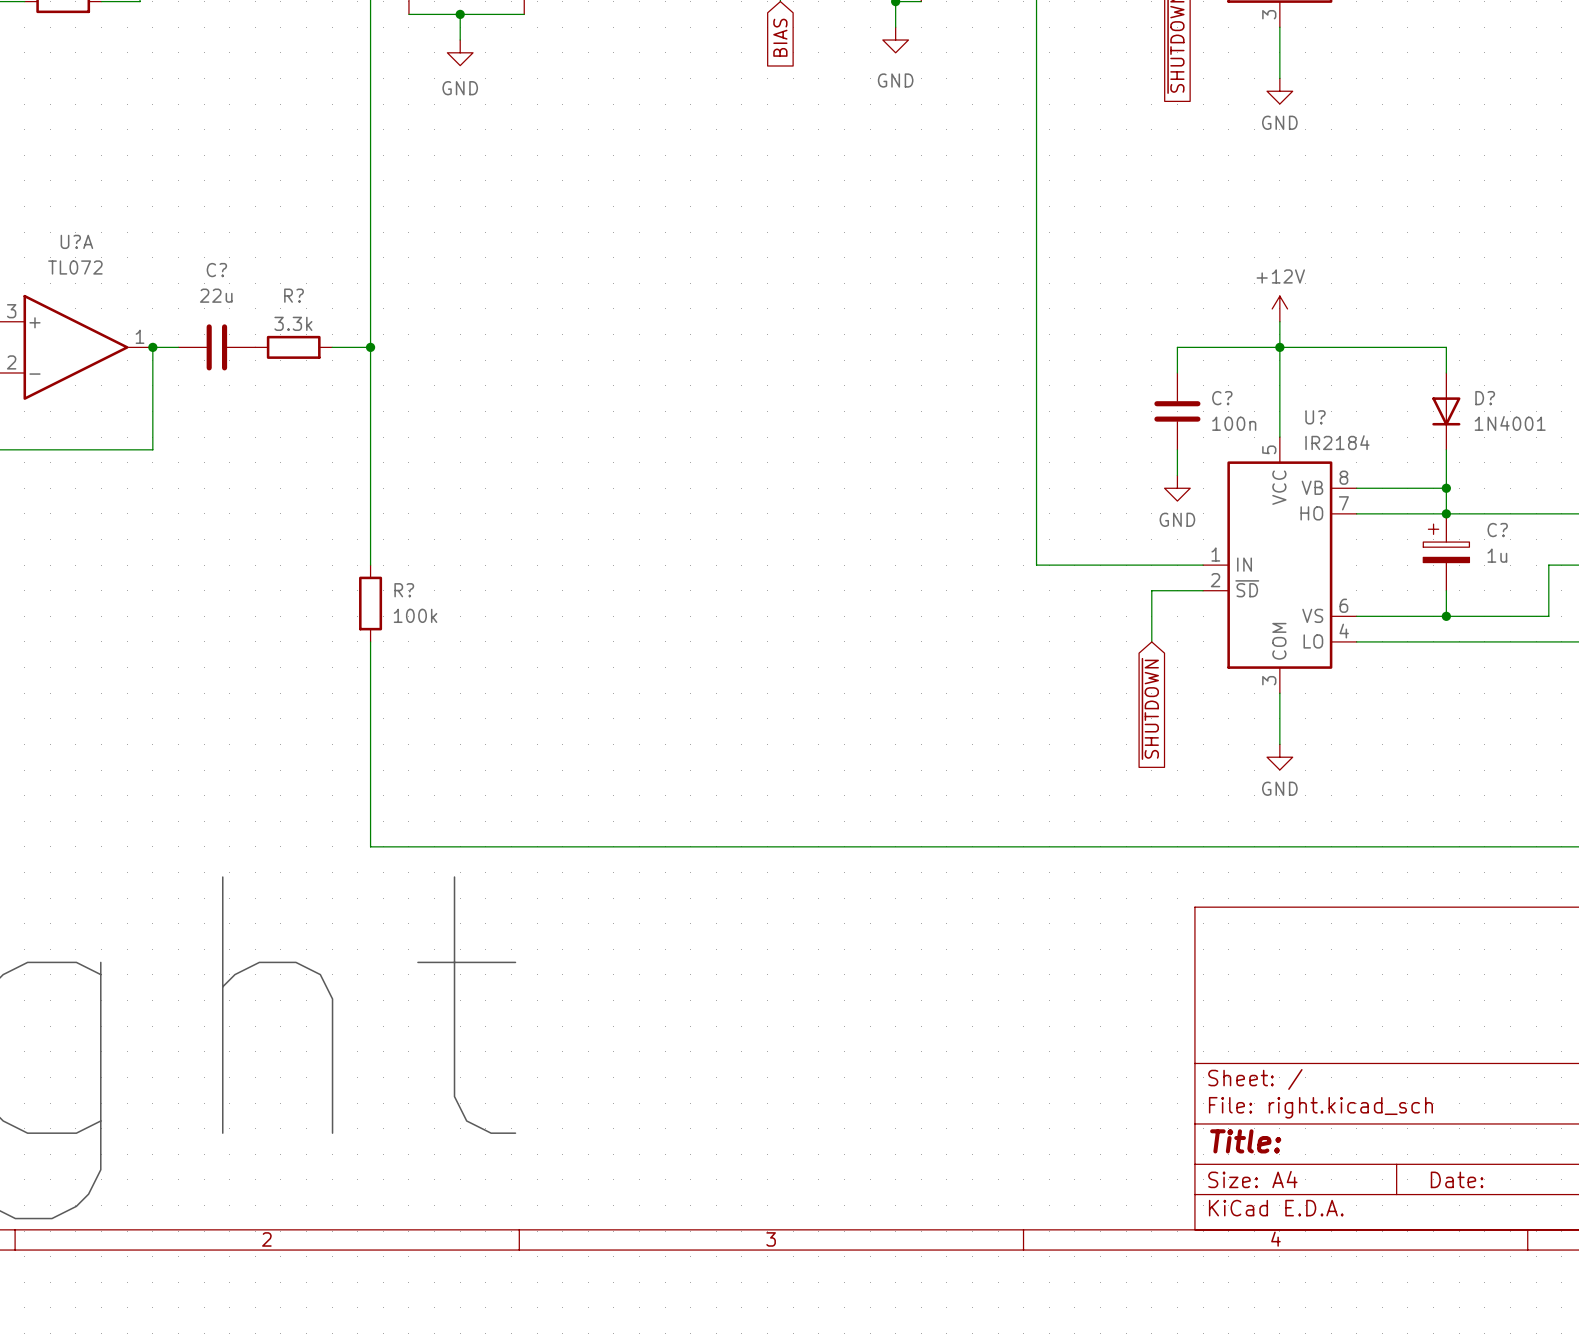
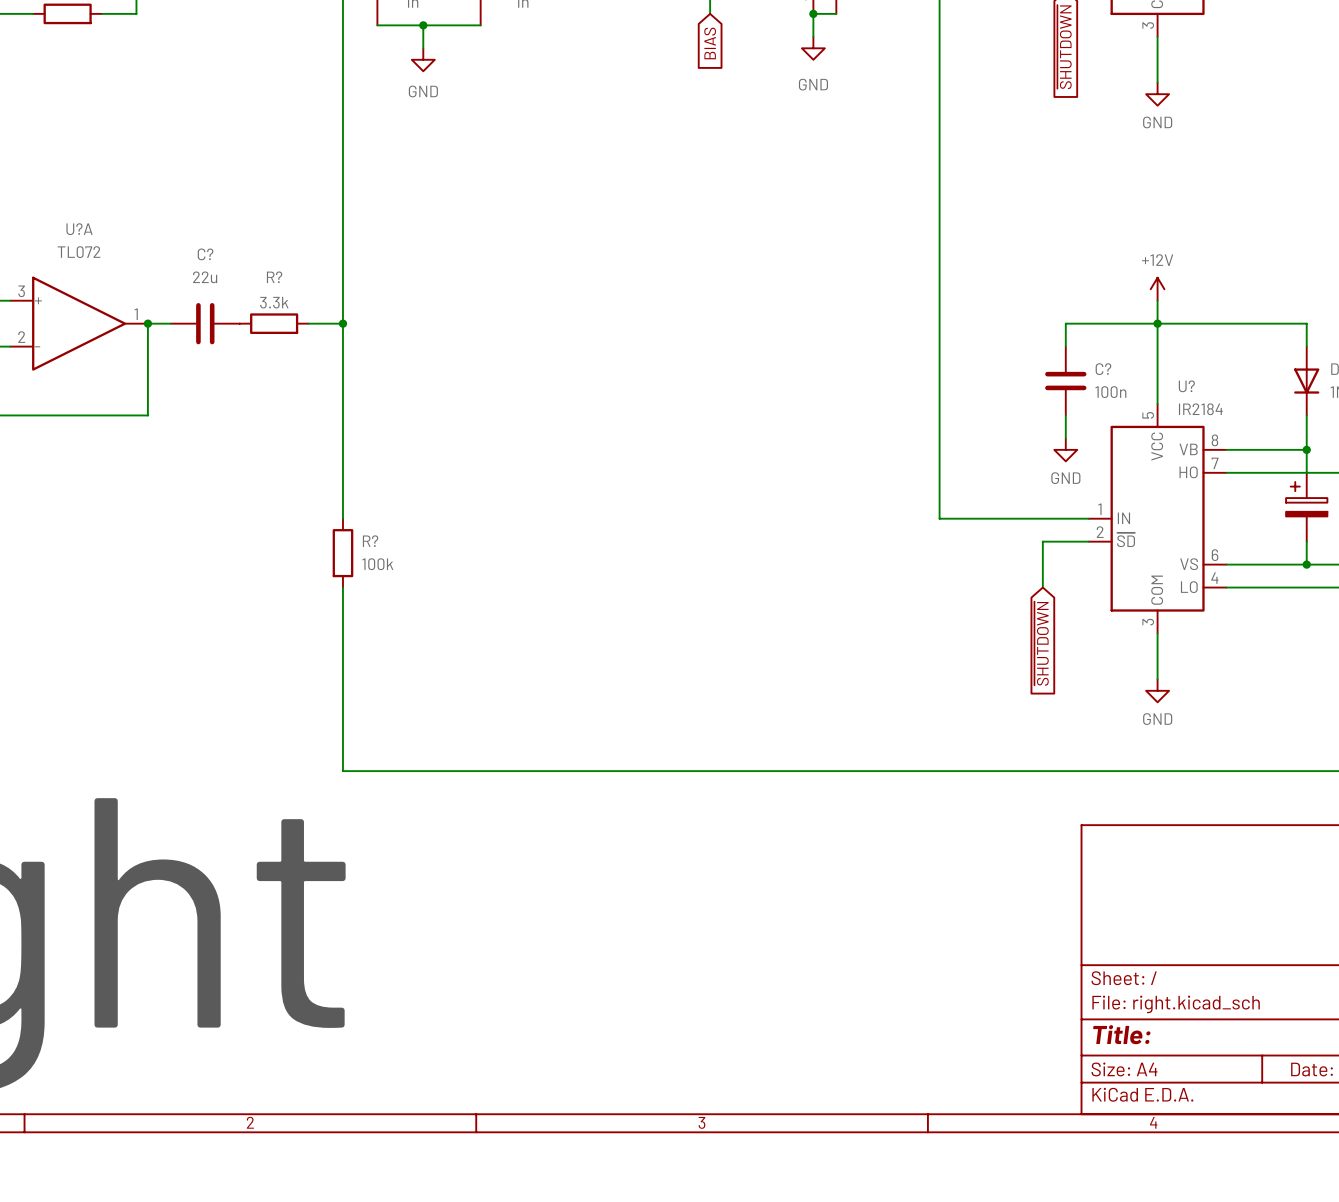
junction: (1446, 513) -> none

